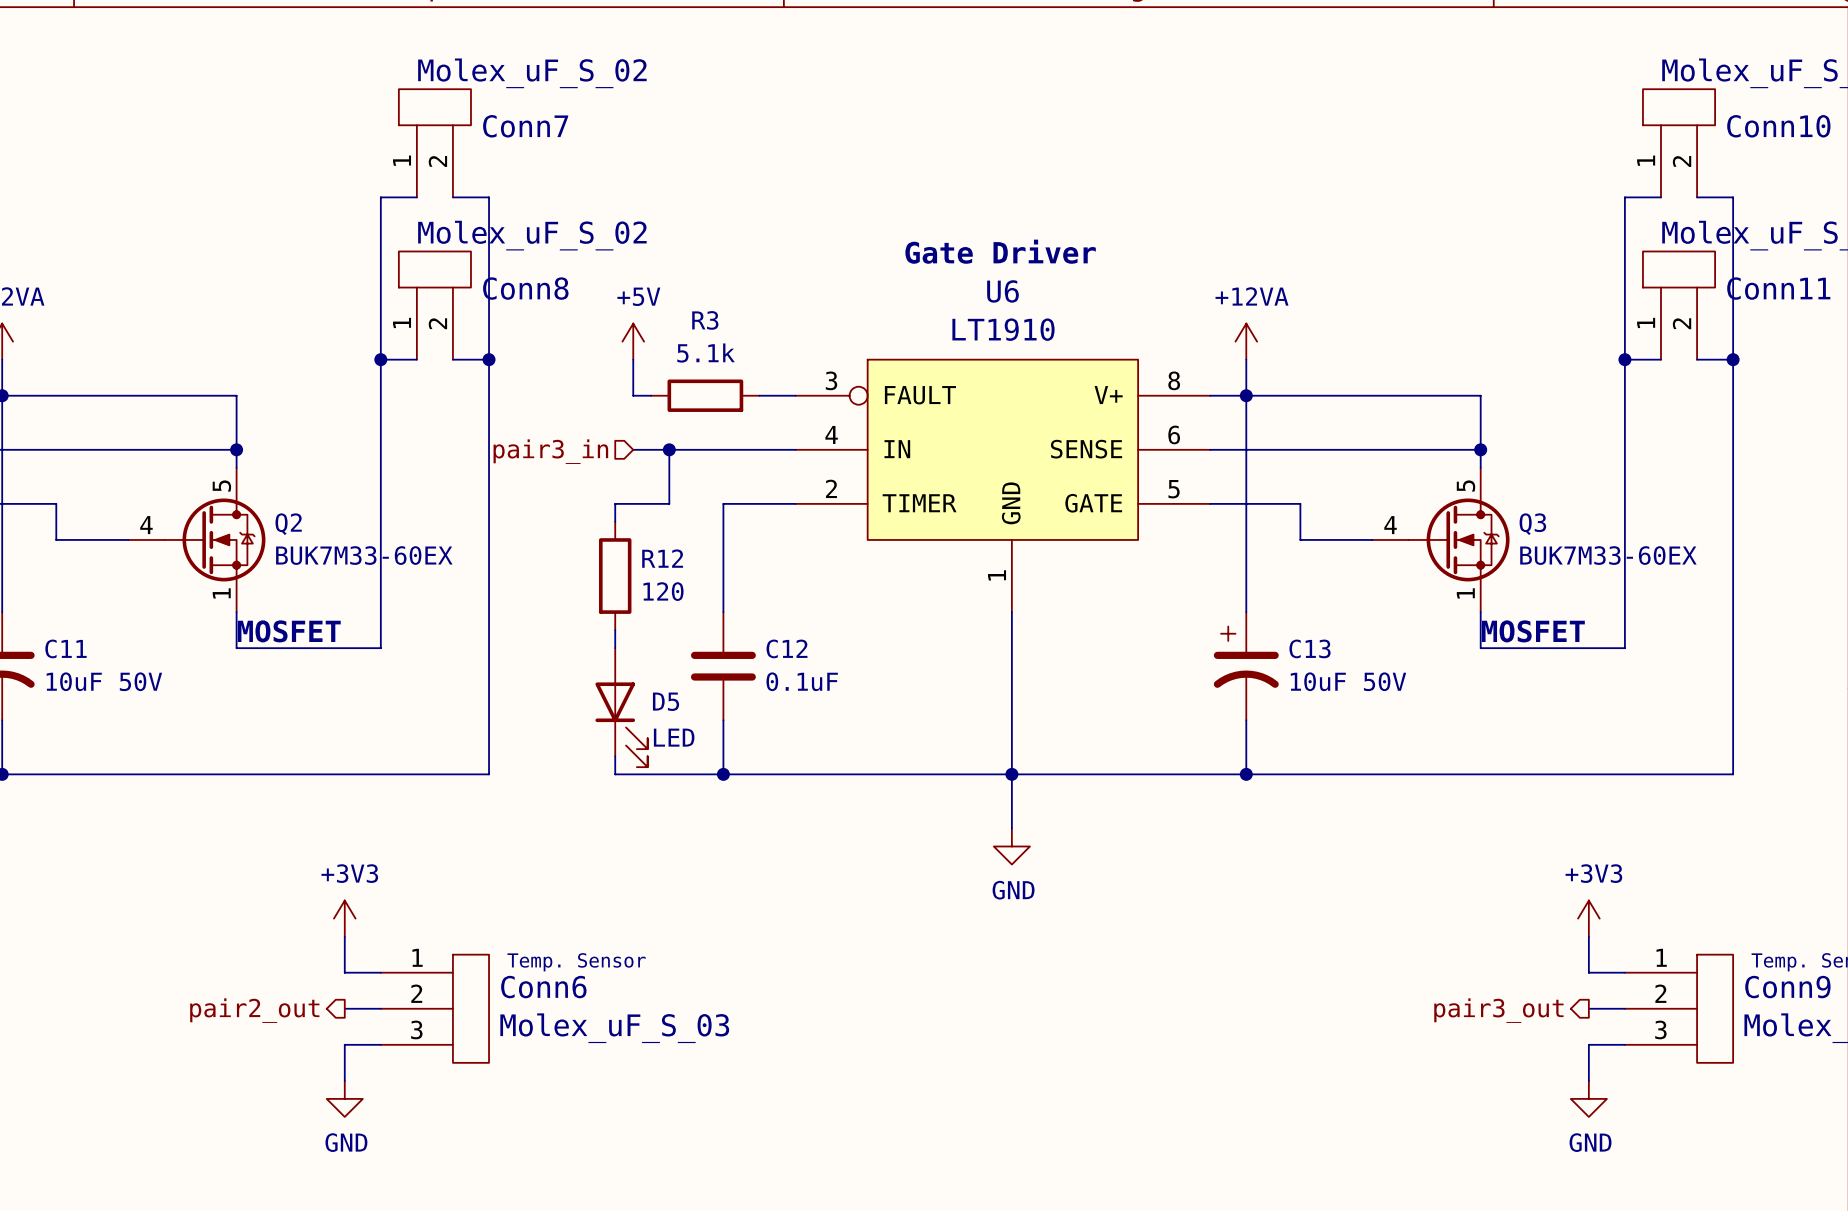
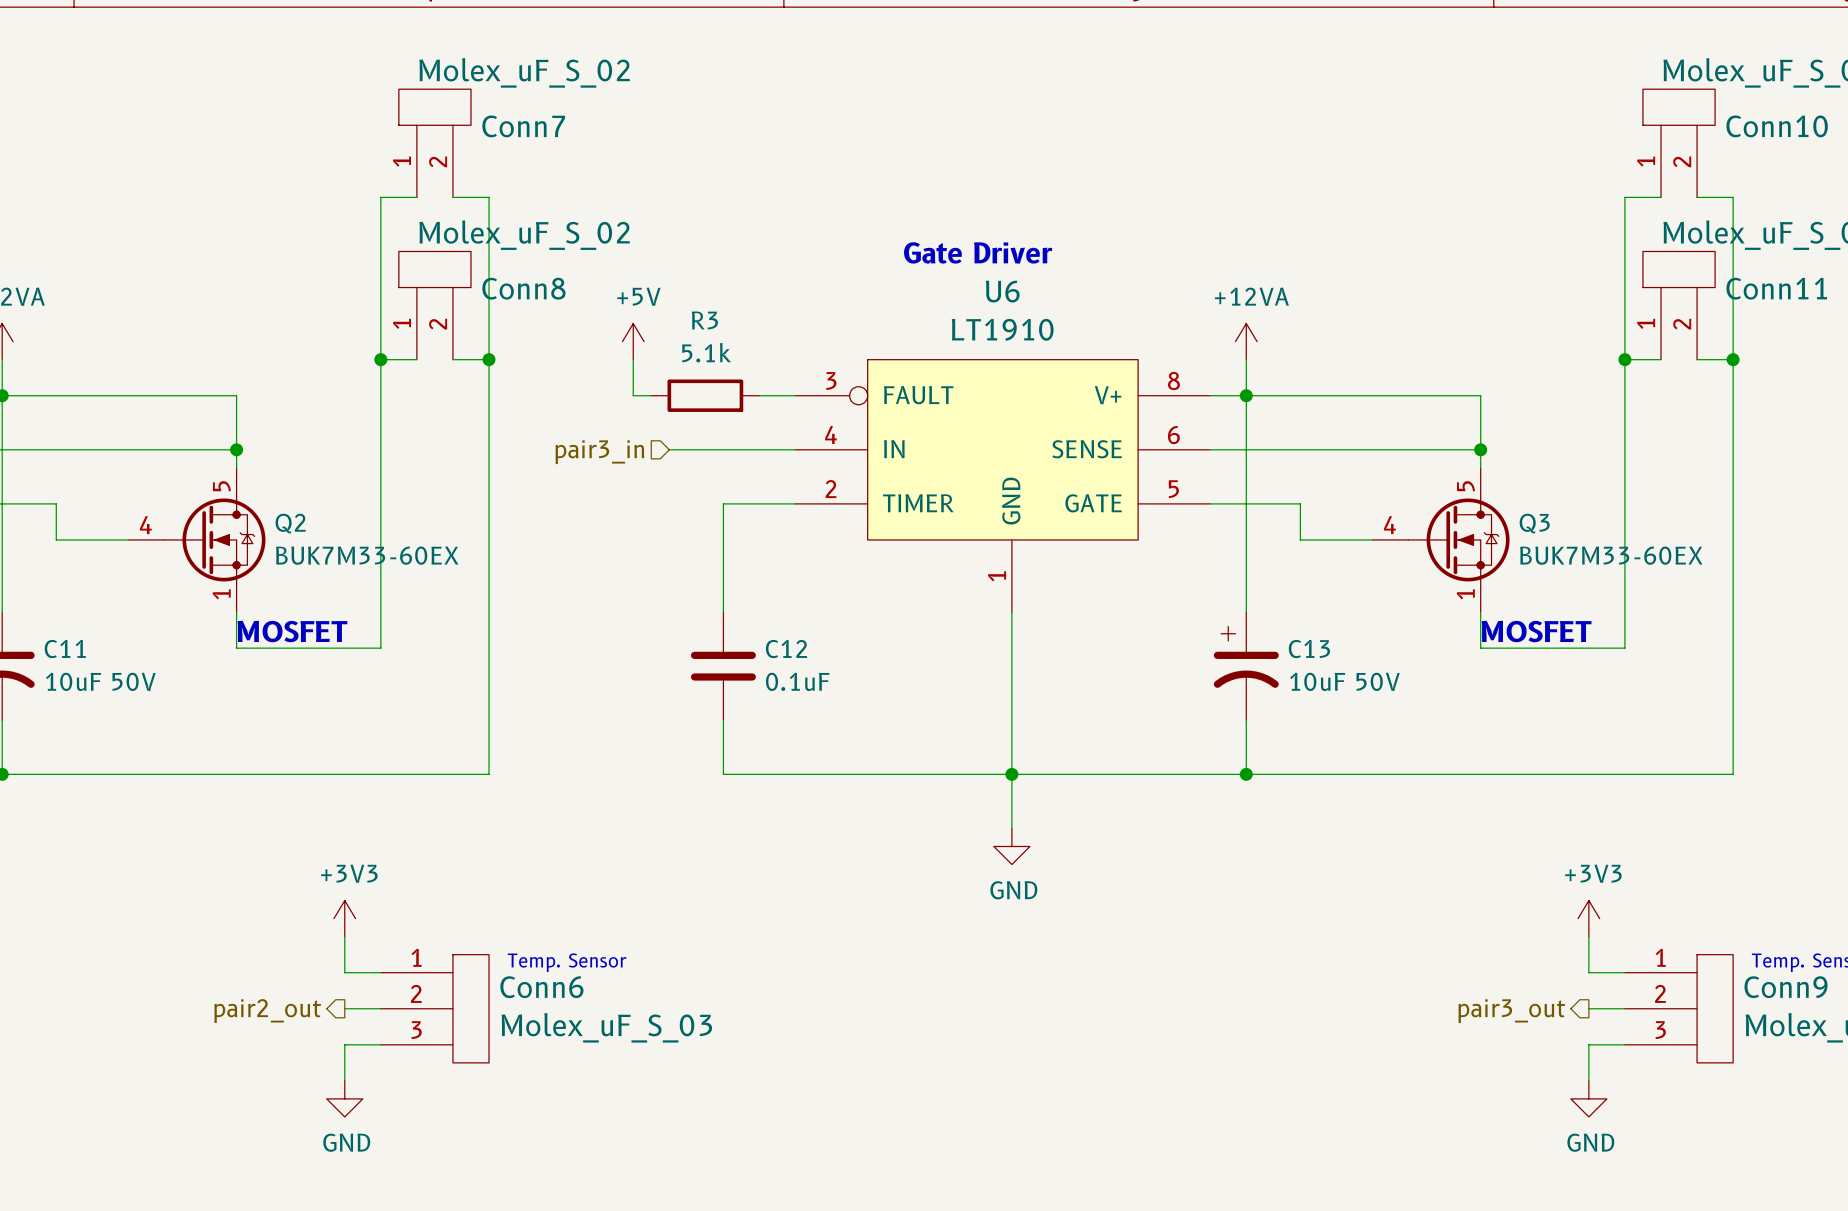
wire: (633, 449) (669, 449) (669, 503) (615, 503) (615, 521) -> none
junction: (669, 449) -> none
hierarchical label position: pair3_in (550, 451) -> pair3_in (599, 452)
R12: 120 (615, 576) -> none
wire: (615, 630) (615, 648) -> none
D5: LED (621, 707) -> none
wire: (615, 756) (615, 774) (723, 774) -> none
junction: (723, 774) -> none

